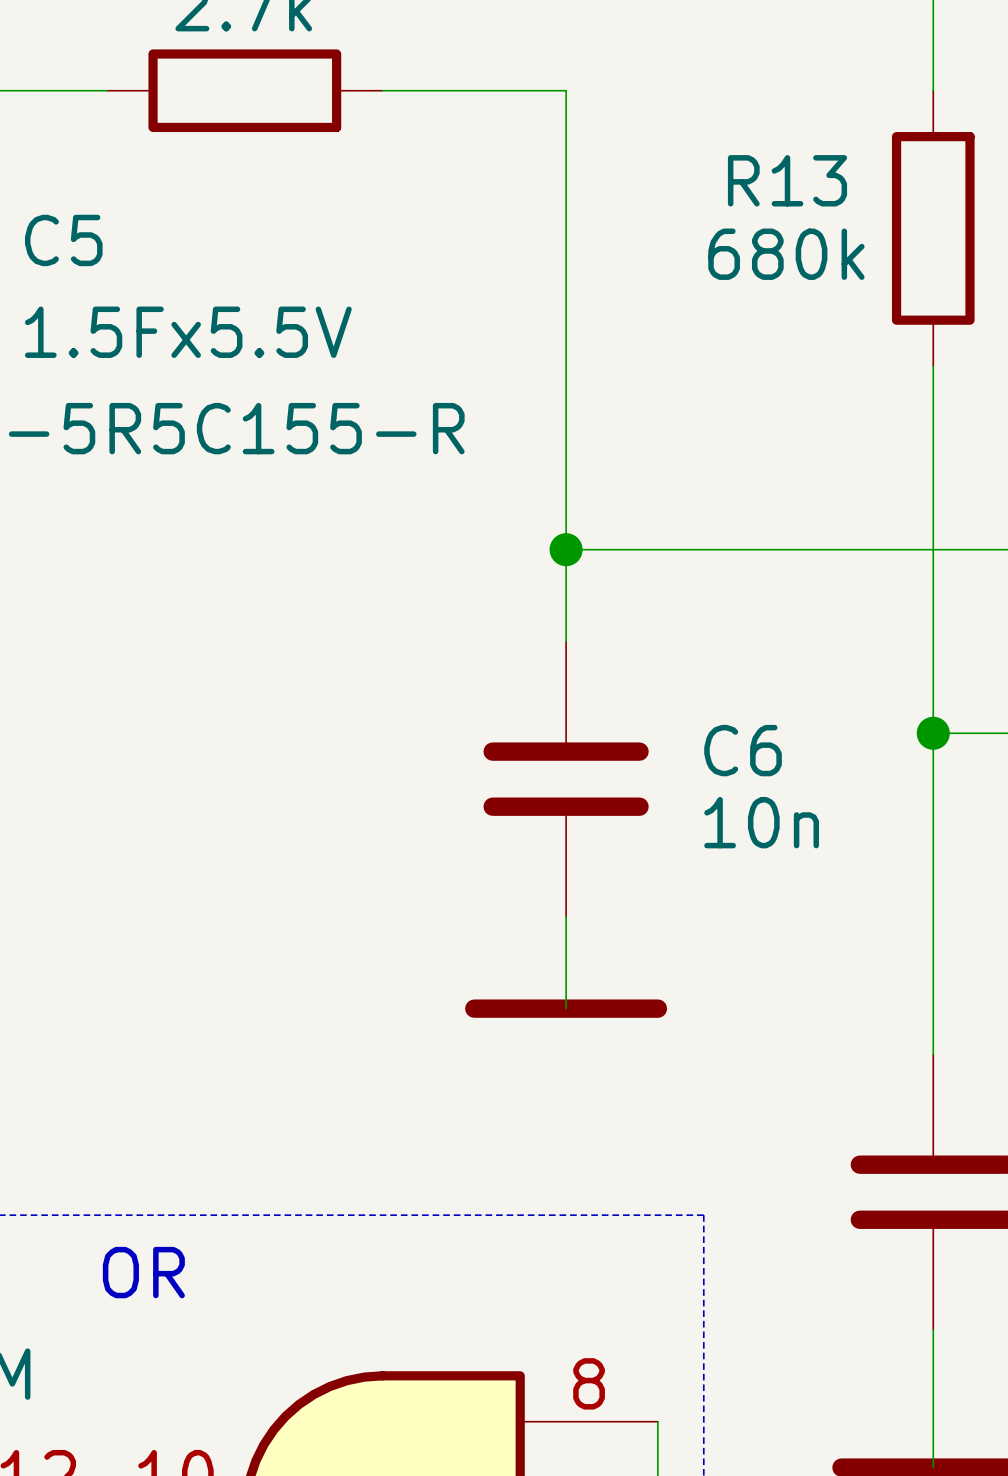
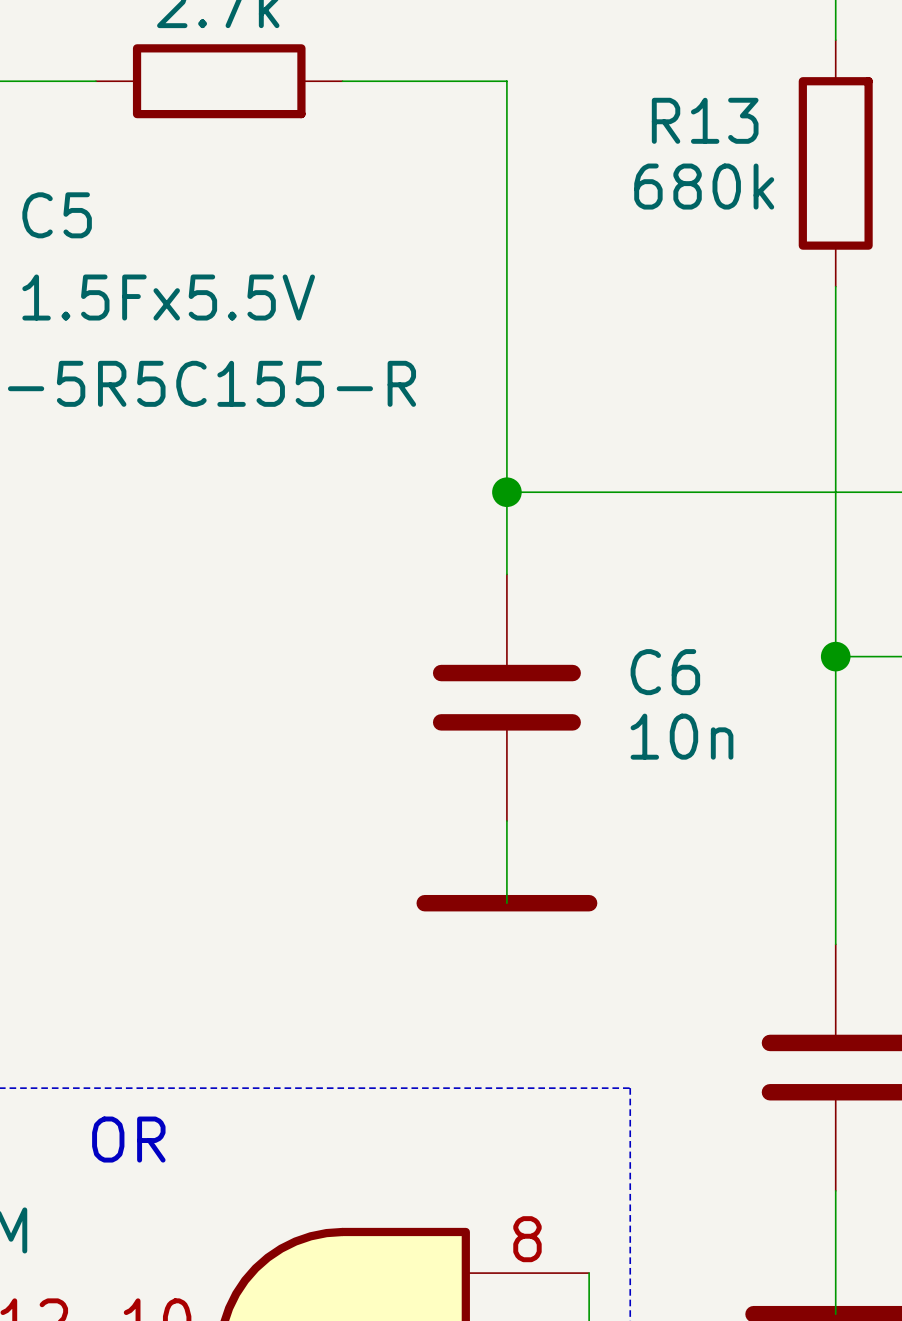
R13 position: (933, 228) -> (835, 163)

